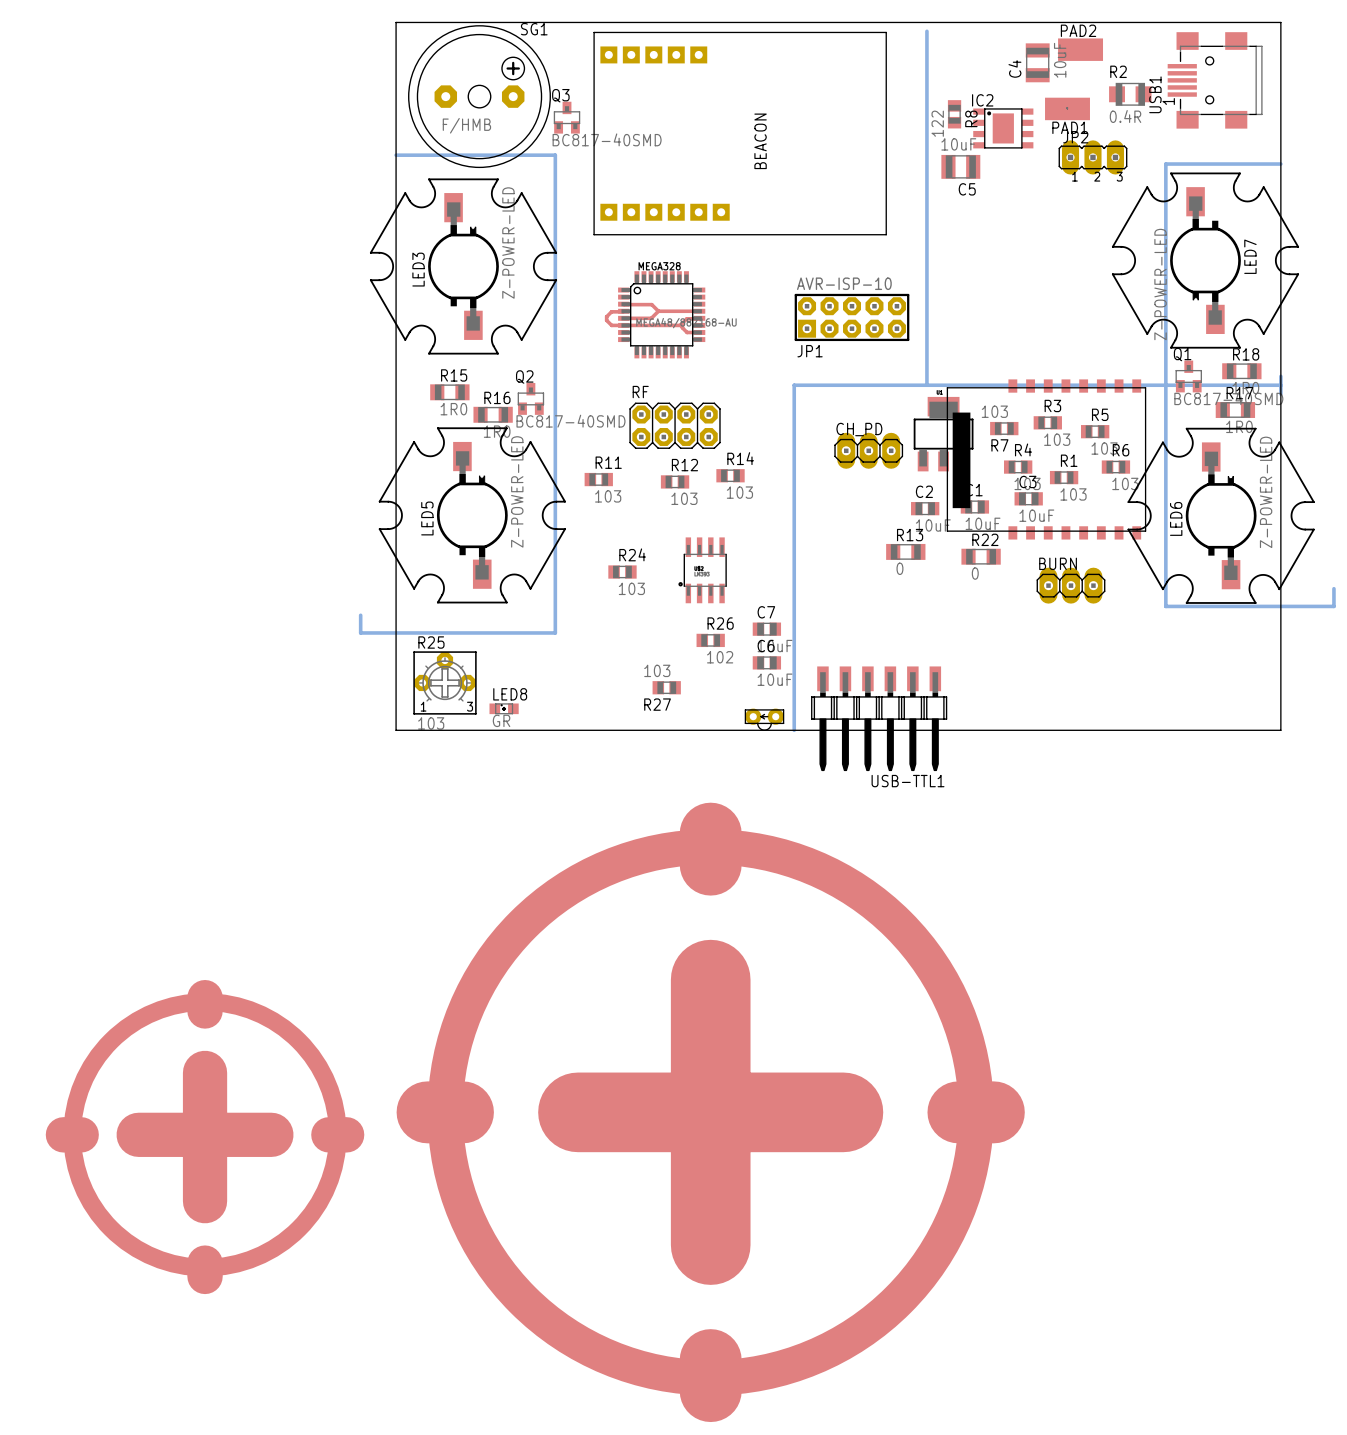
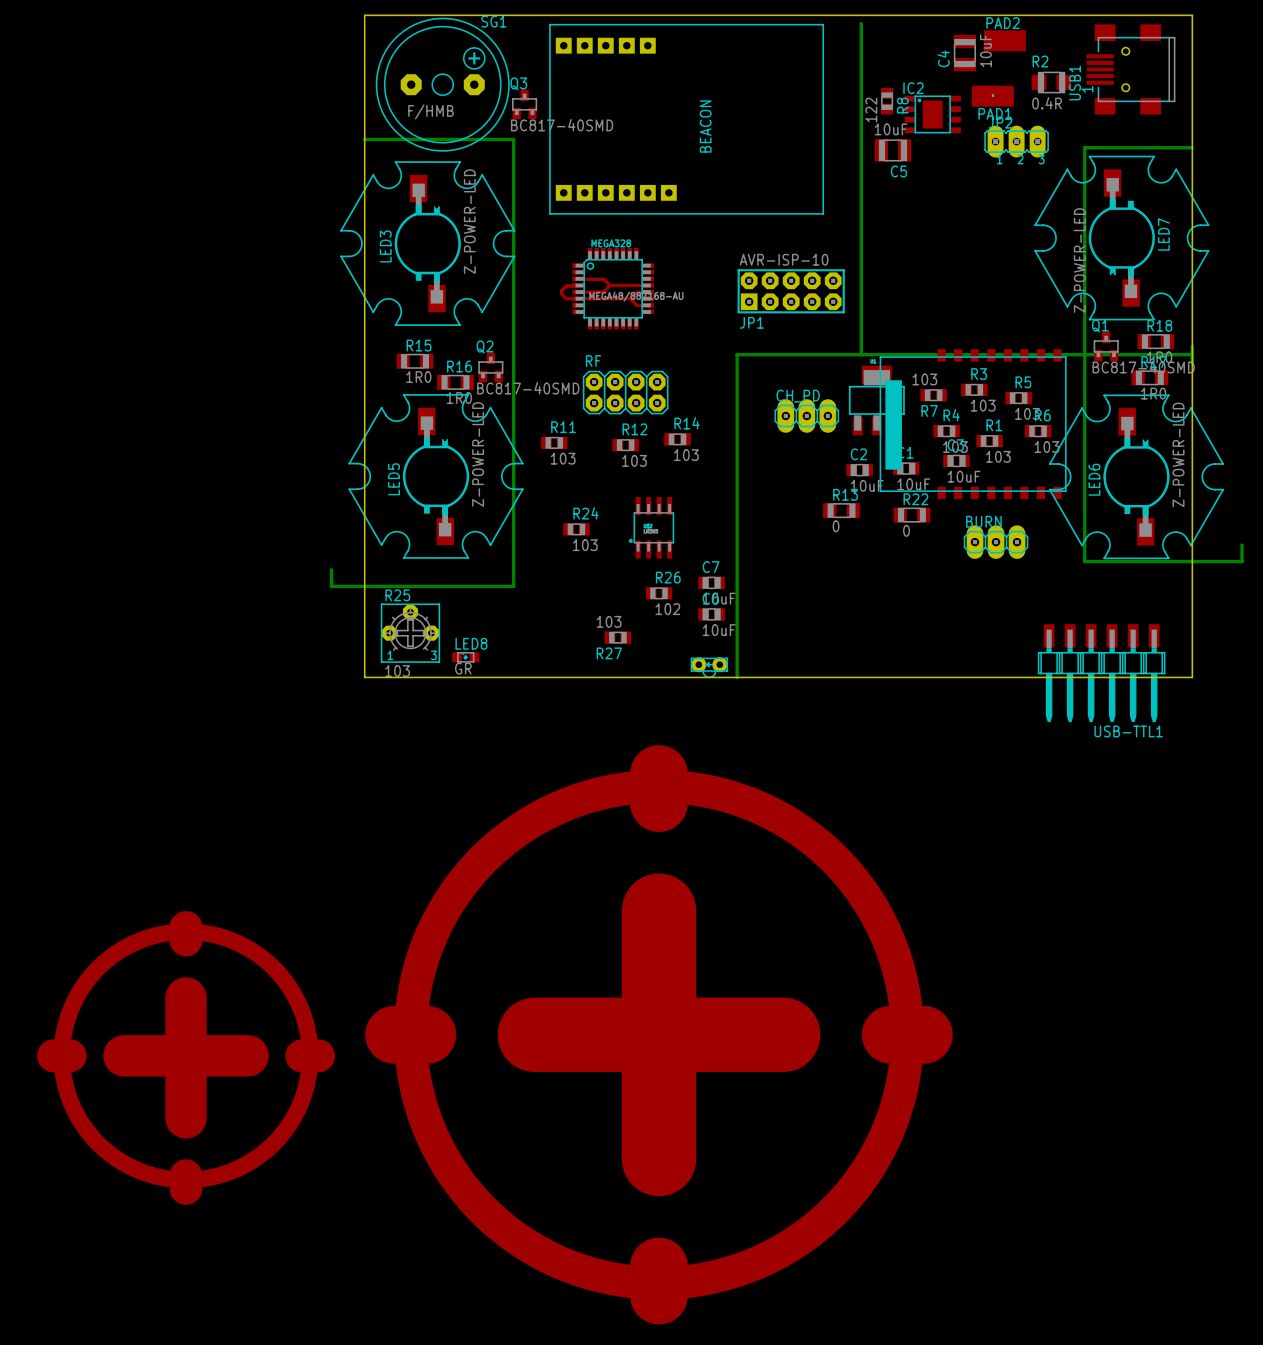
USB-TTL1 footprint: [811, 666, 948, 772] -> [1037, 624, 1166, 723]

